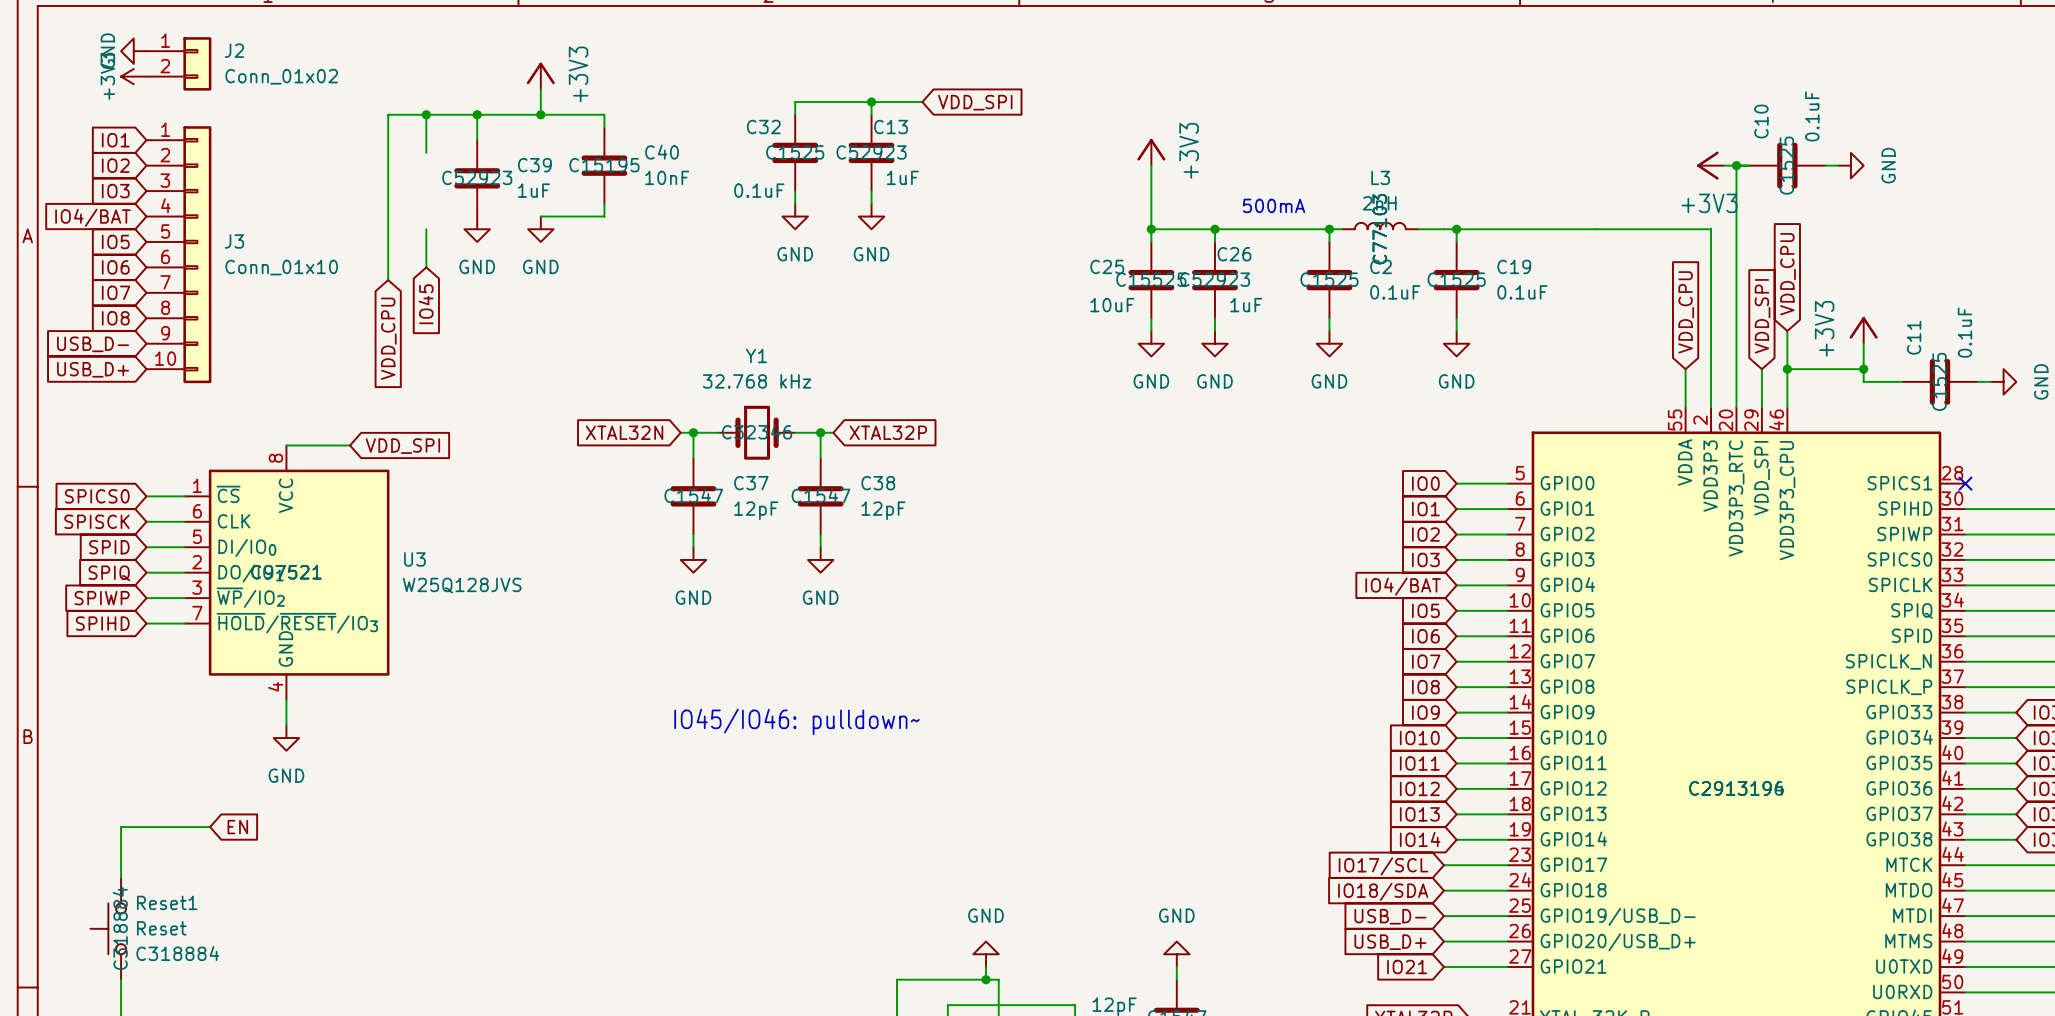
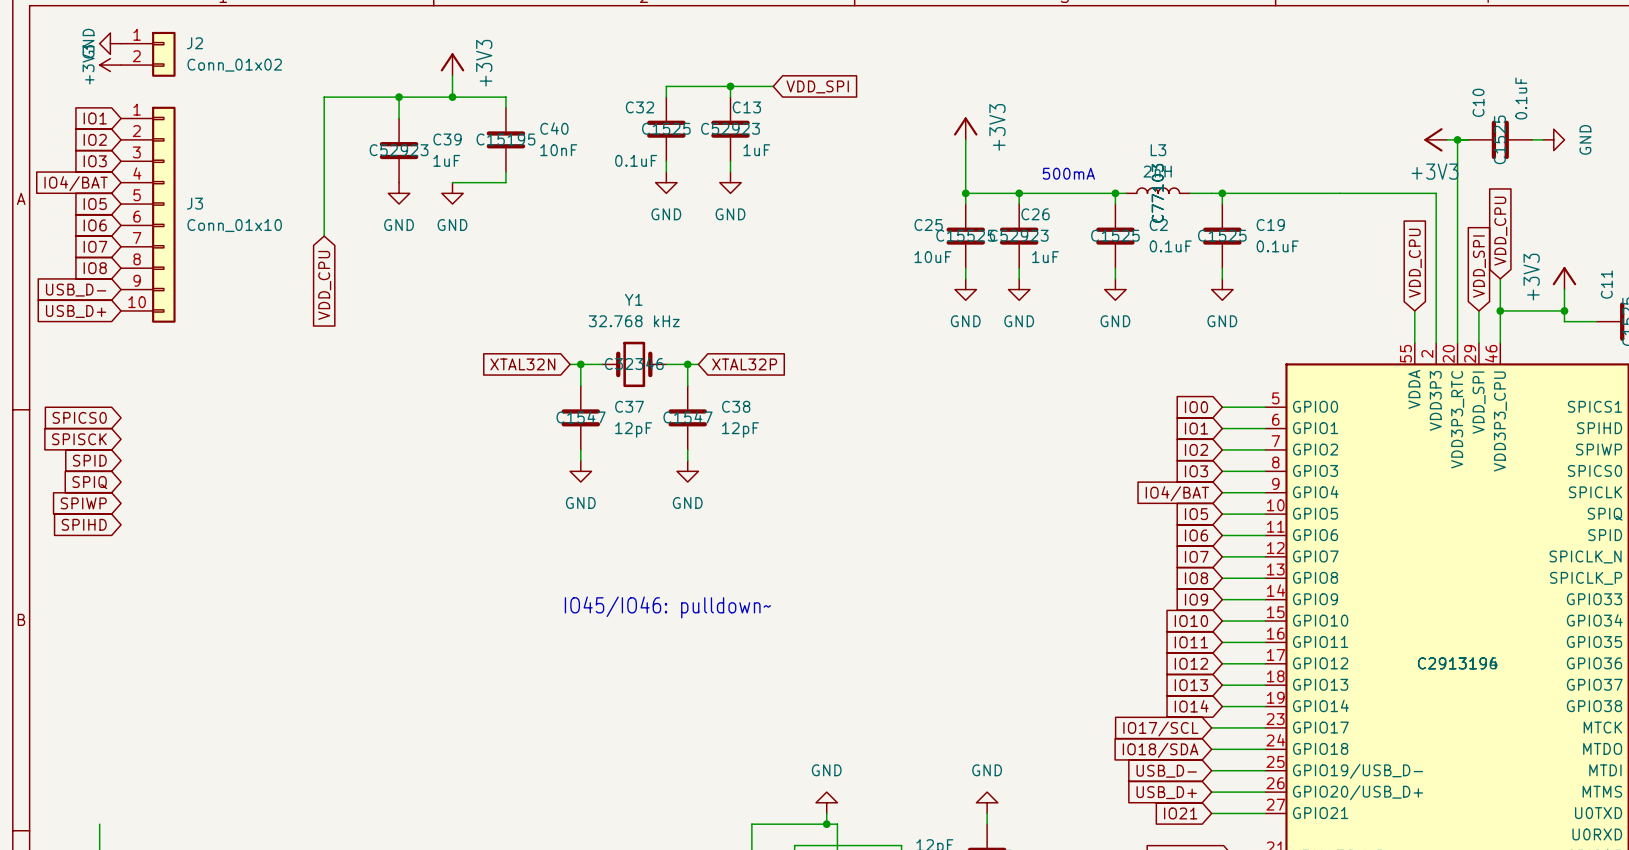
wire: (426, 114) (426, 152) -> none
junction: (426, 114) -> none
wire: (426, 229) (426, 267) -> none
global label: IO45 (426, 304) -> none
wire: (286, 445) (350, 445) -> none
global label: VDD_SPI (402, 446) -> none
wire: (146, 496) (184, 496) -> none
wire: (146, 521) (184, 521) -> none
wire: (146, 547) (184, 547) -> none
wire: (146, 572) (184, 572) -> none
U3: W25Q128JVS (287, 572) -> none
wire: (146, 598) (184, 598) -> none
wire: (146, 623) (184, 623) -> none
wire: (286, 699) (286, 725) -> none
power symbol: GND (286, 738) -> none
wire: (210, 827) (121, 827) (121, 877) -> none
global label: EN (237, 827) -> none
Reset1: Reset (108, 928) -> none

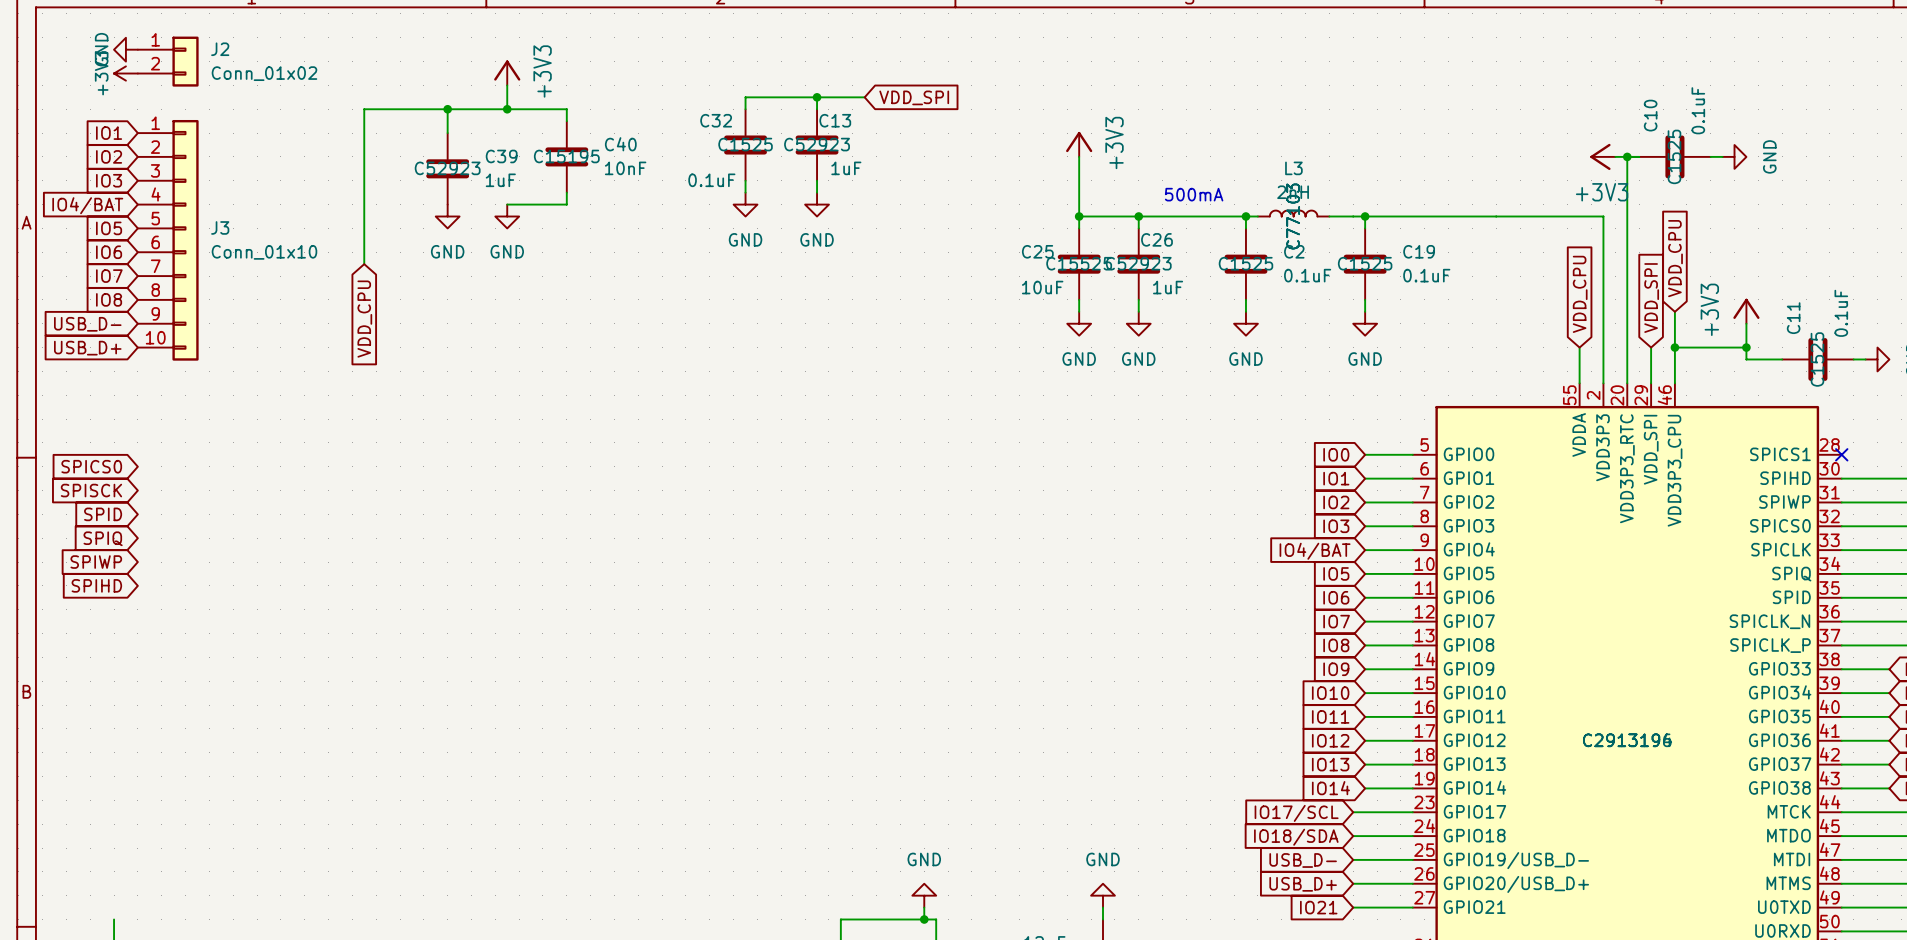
global label: XTAL32N (522, 364) -> none
wire: (570, 364) (602, 364) -> none
wire: (580, 364) (580, 385) -> none
junction: (580, 364) -> none
Y1: 32.768 kHz (634, 364) -> none
wire: (666, 364) (698, 364) -> none
wire: (687, 364) (687, 385) -> none
junction: (687, 364) -> none
global label: XTAL32P (744, 364) -> none
C37: 12pF (580, 417) -> none
C38: 12pF (687, 417) -> none
wire: (580, 449) (580, 460) -> none
wire: (687, 449) (687, 460) -> none
power symbol: GND (580, 471) -> none
power symbol: GND (687, 471) -> none
text: IO45/IO46: pulldown~~{} (667, 607) -> none

